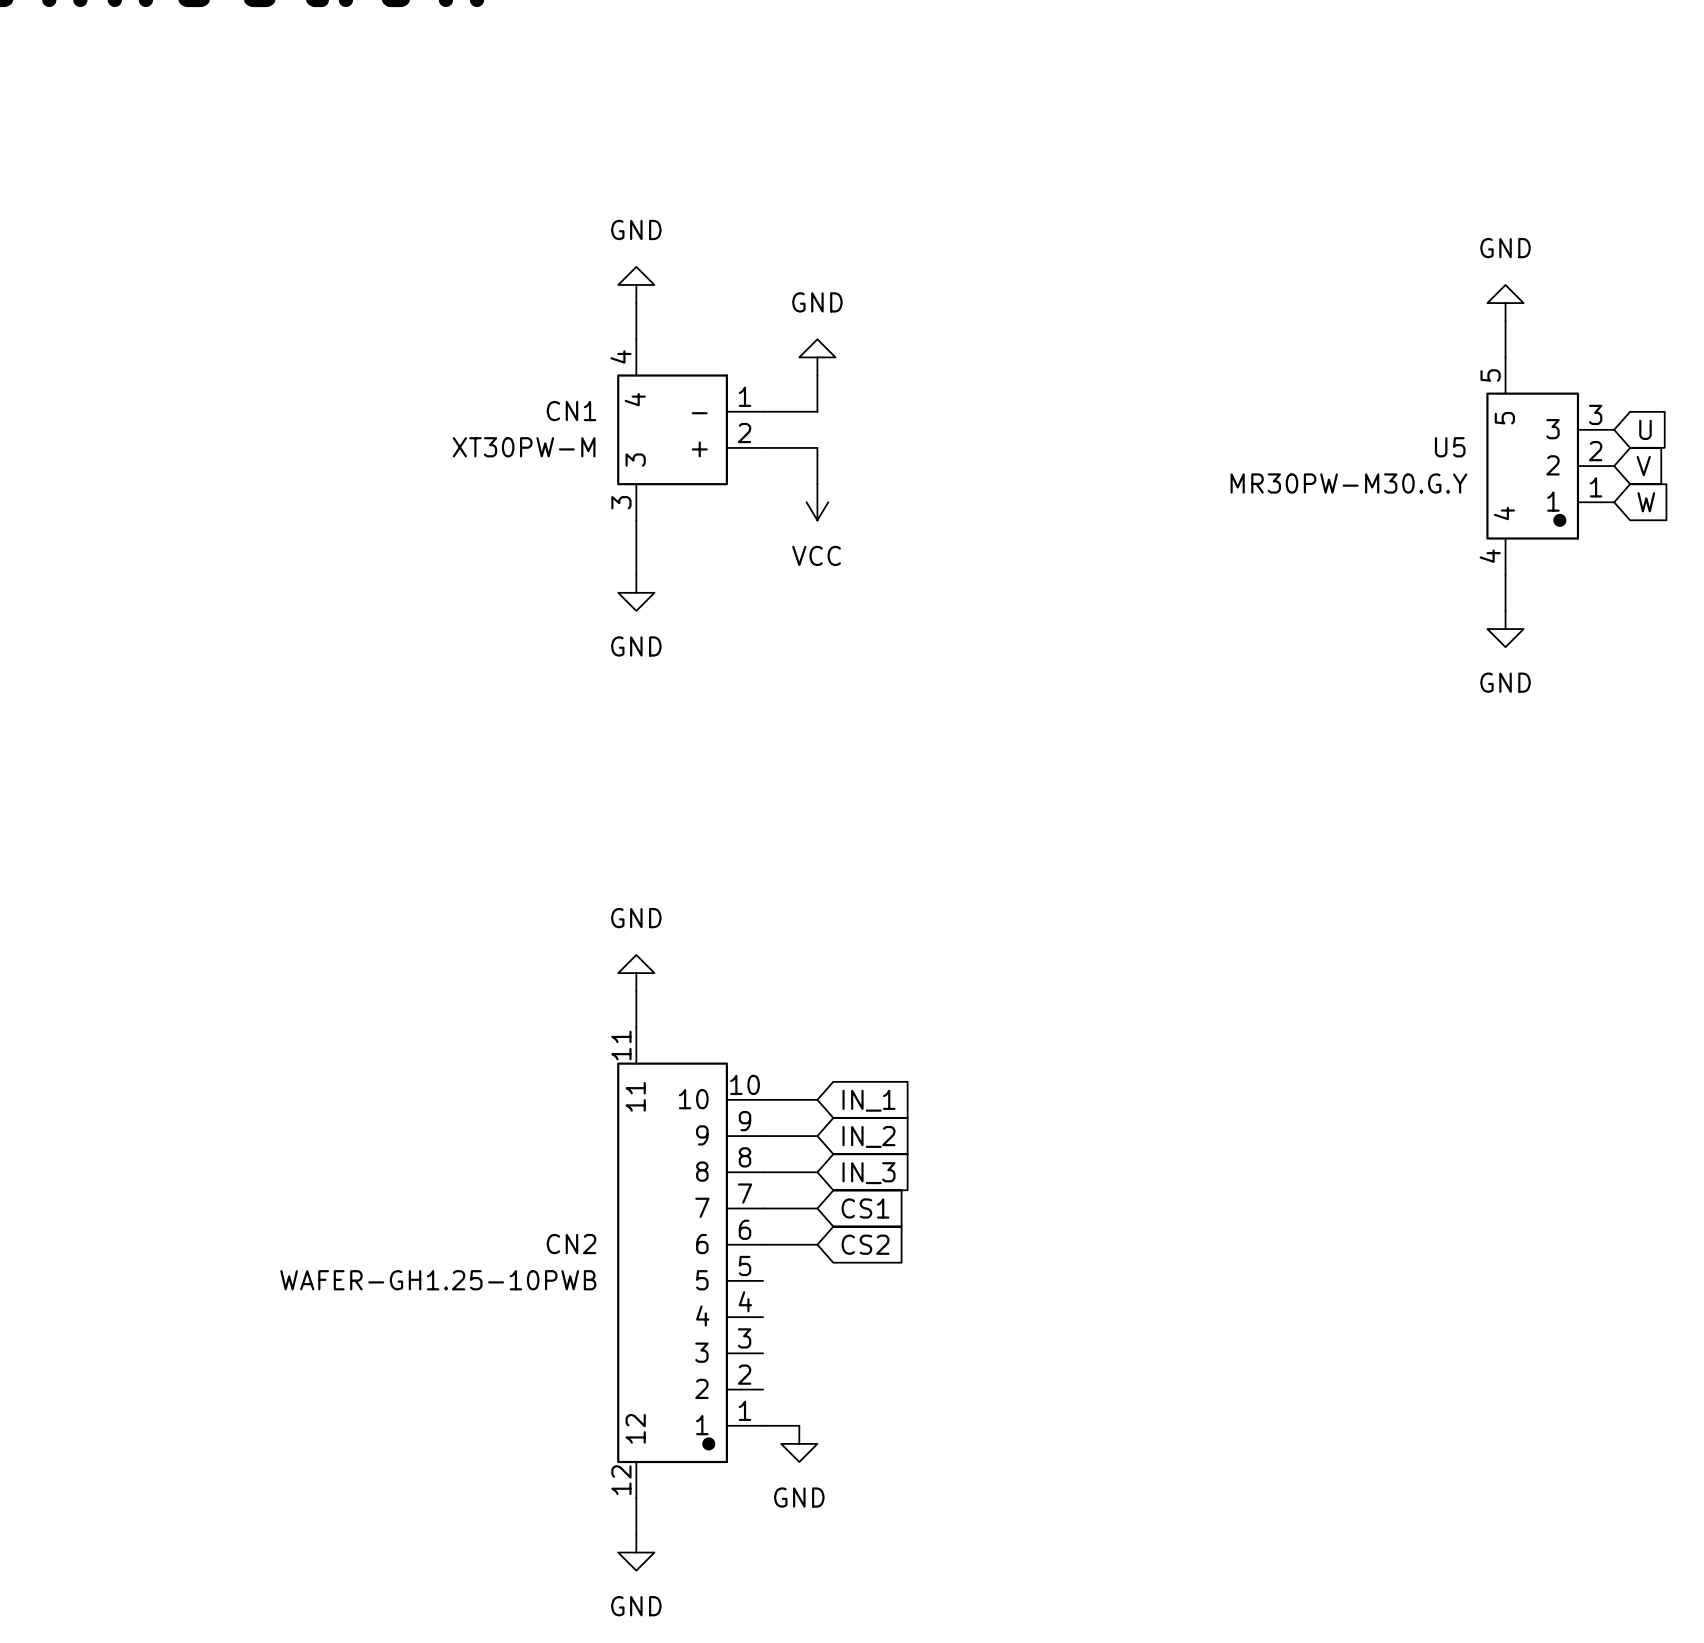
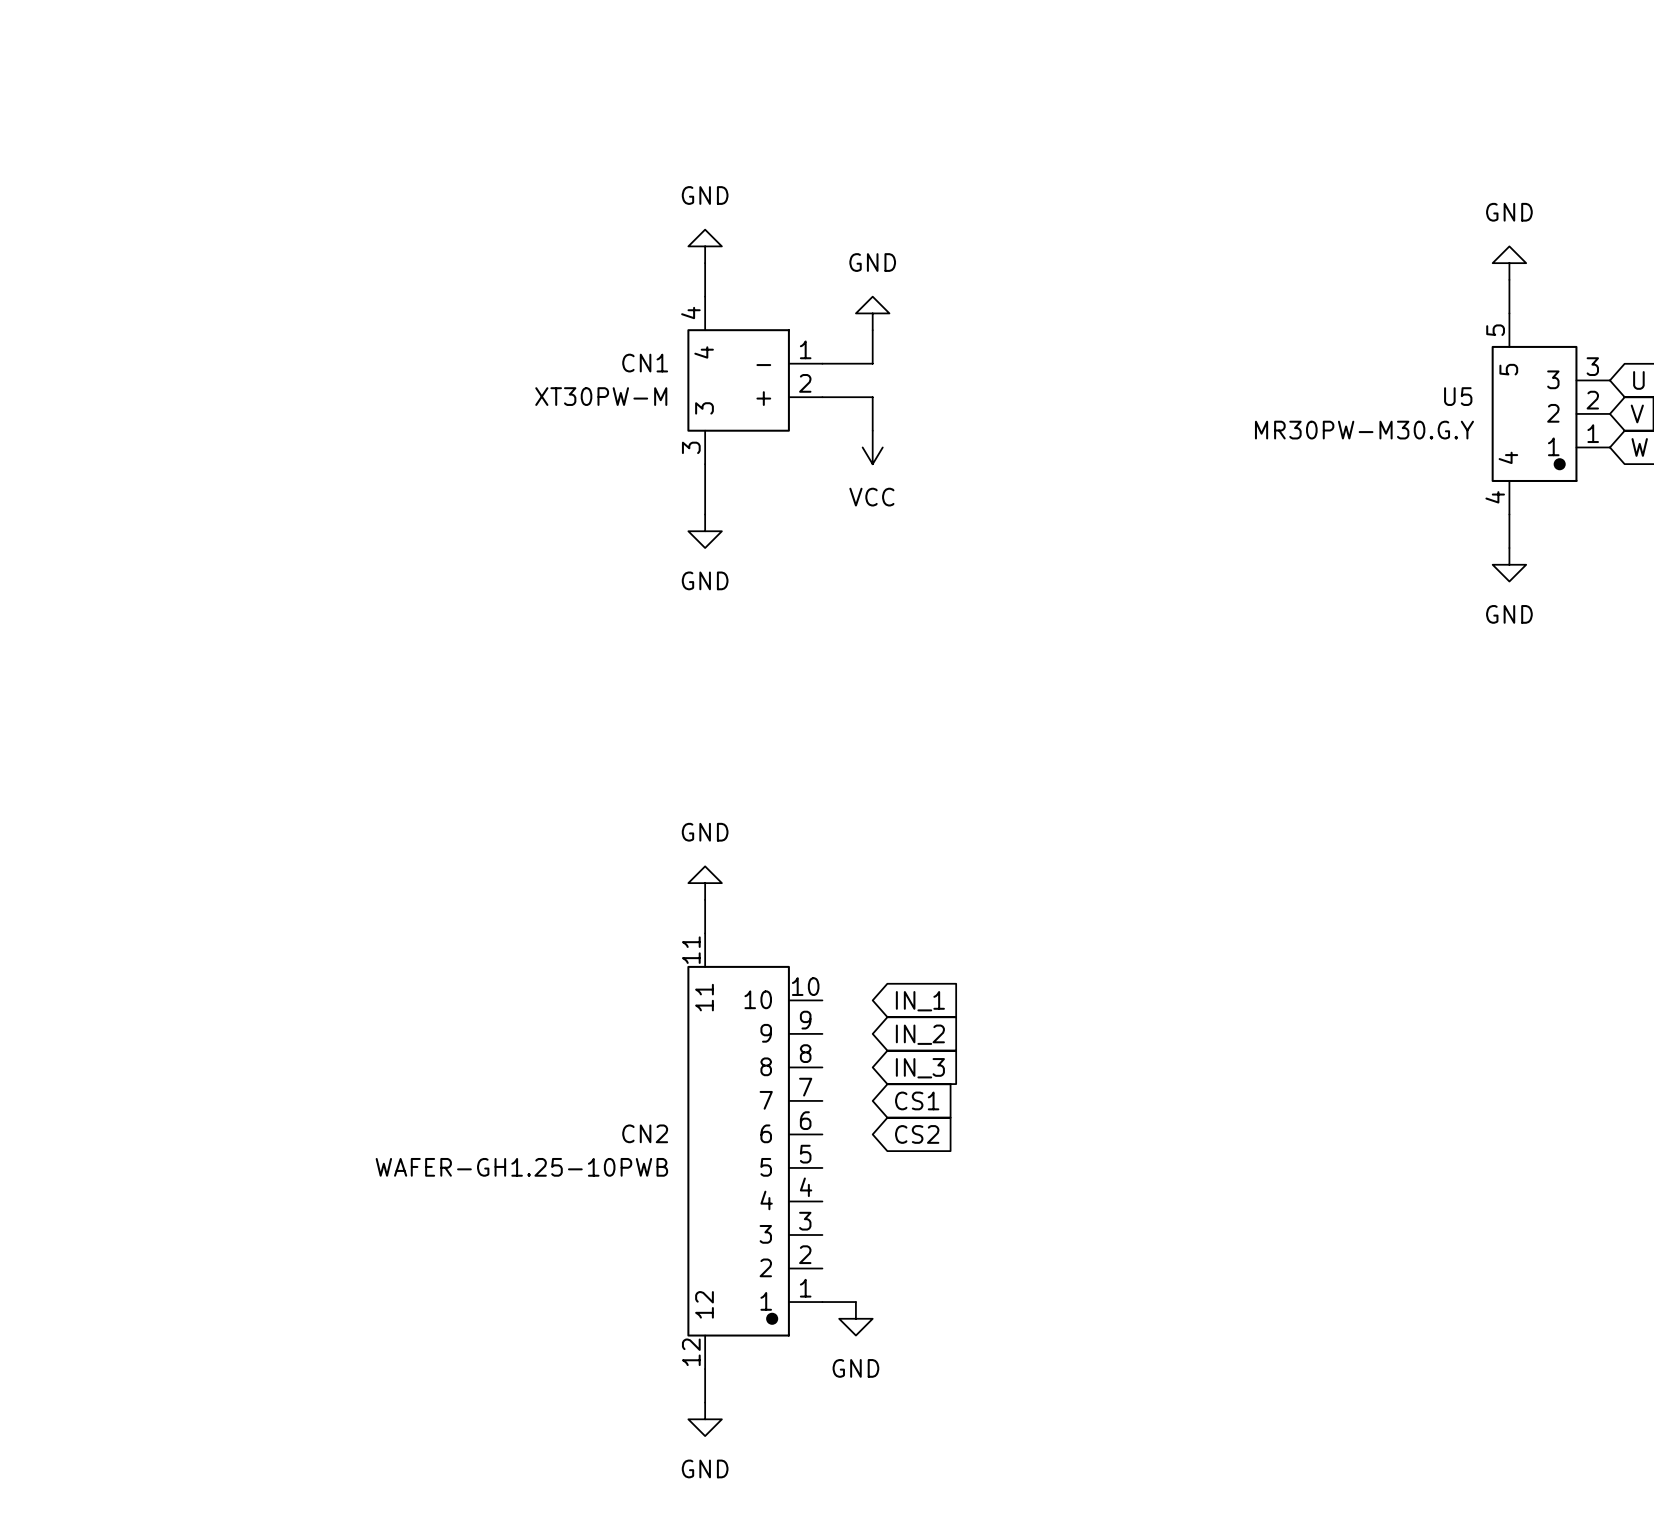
wire: (763, 1099) (817, 1099) -> none
wire: (763, 1136) (817, 1136) -> none
wire: (763, 1172) (817, 1172) -> none
wire: (763, 1208) (817, 1208) -> none
wire: (763, 1244) (817, 1244) -> none

